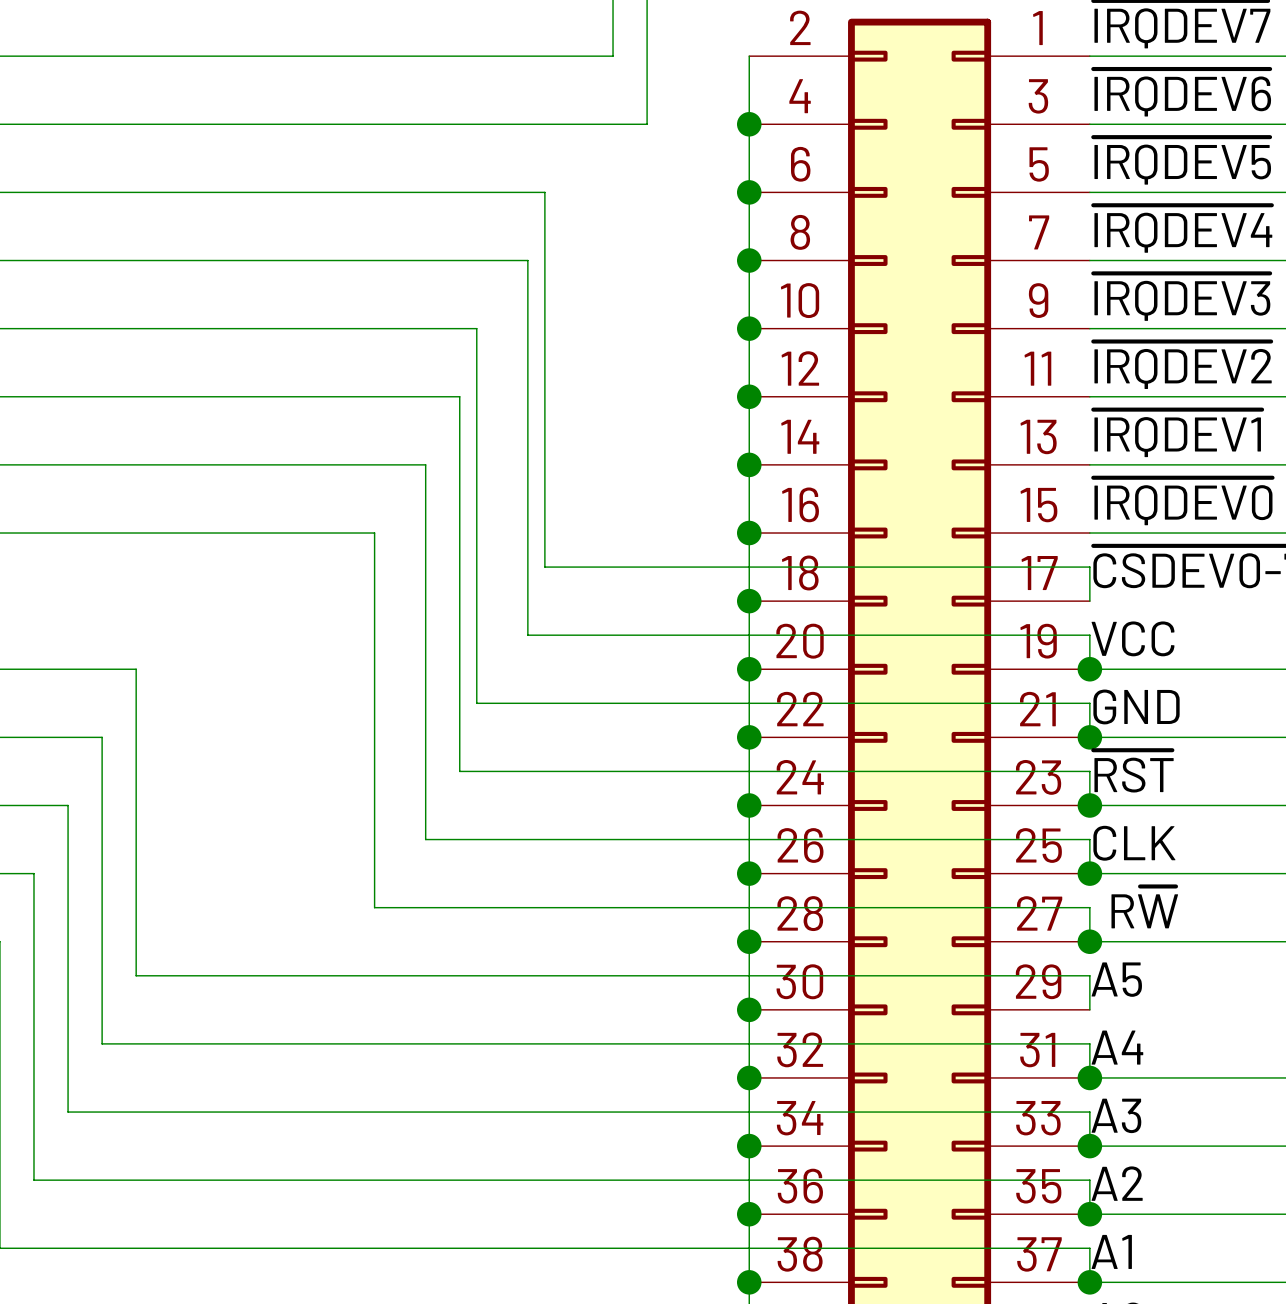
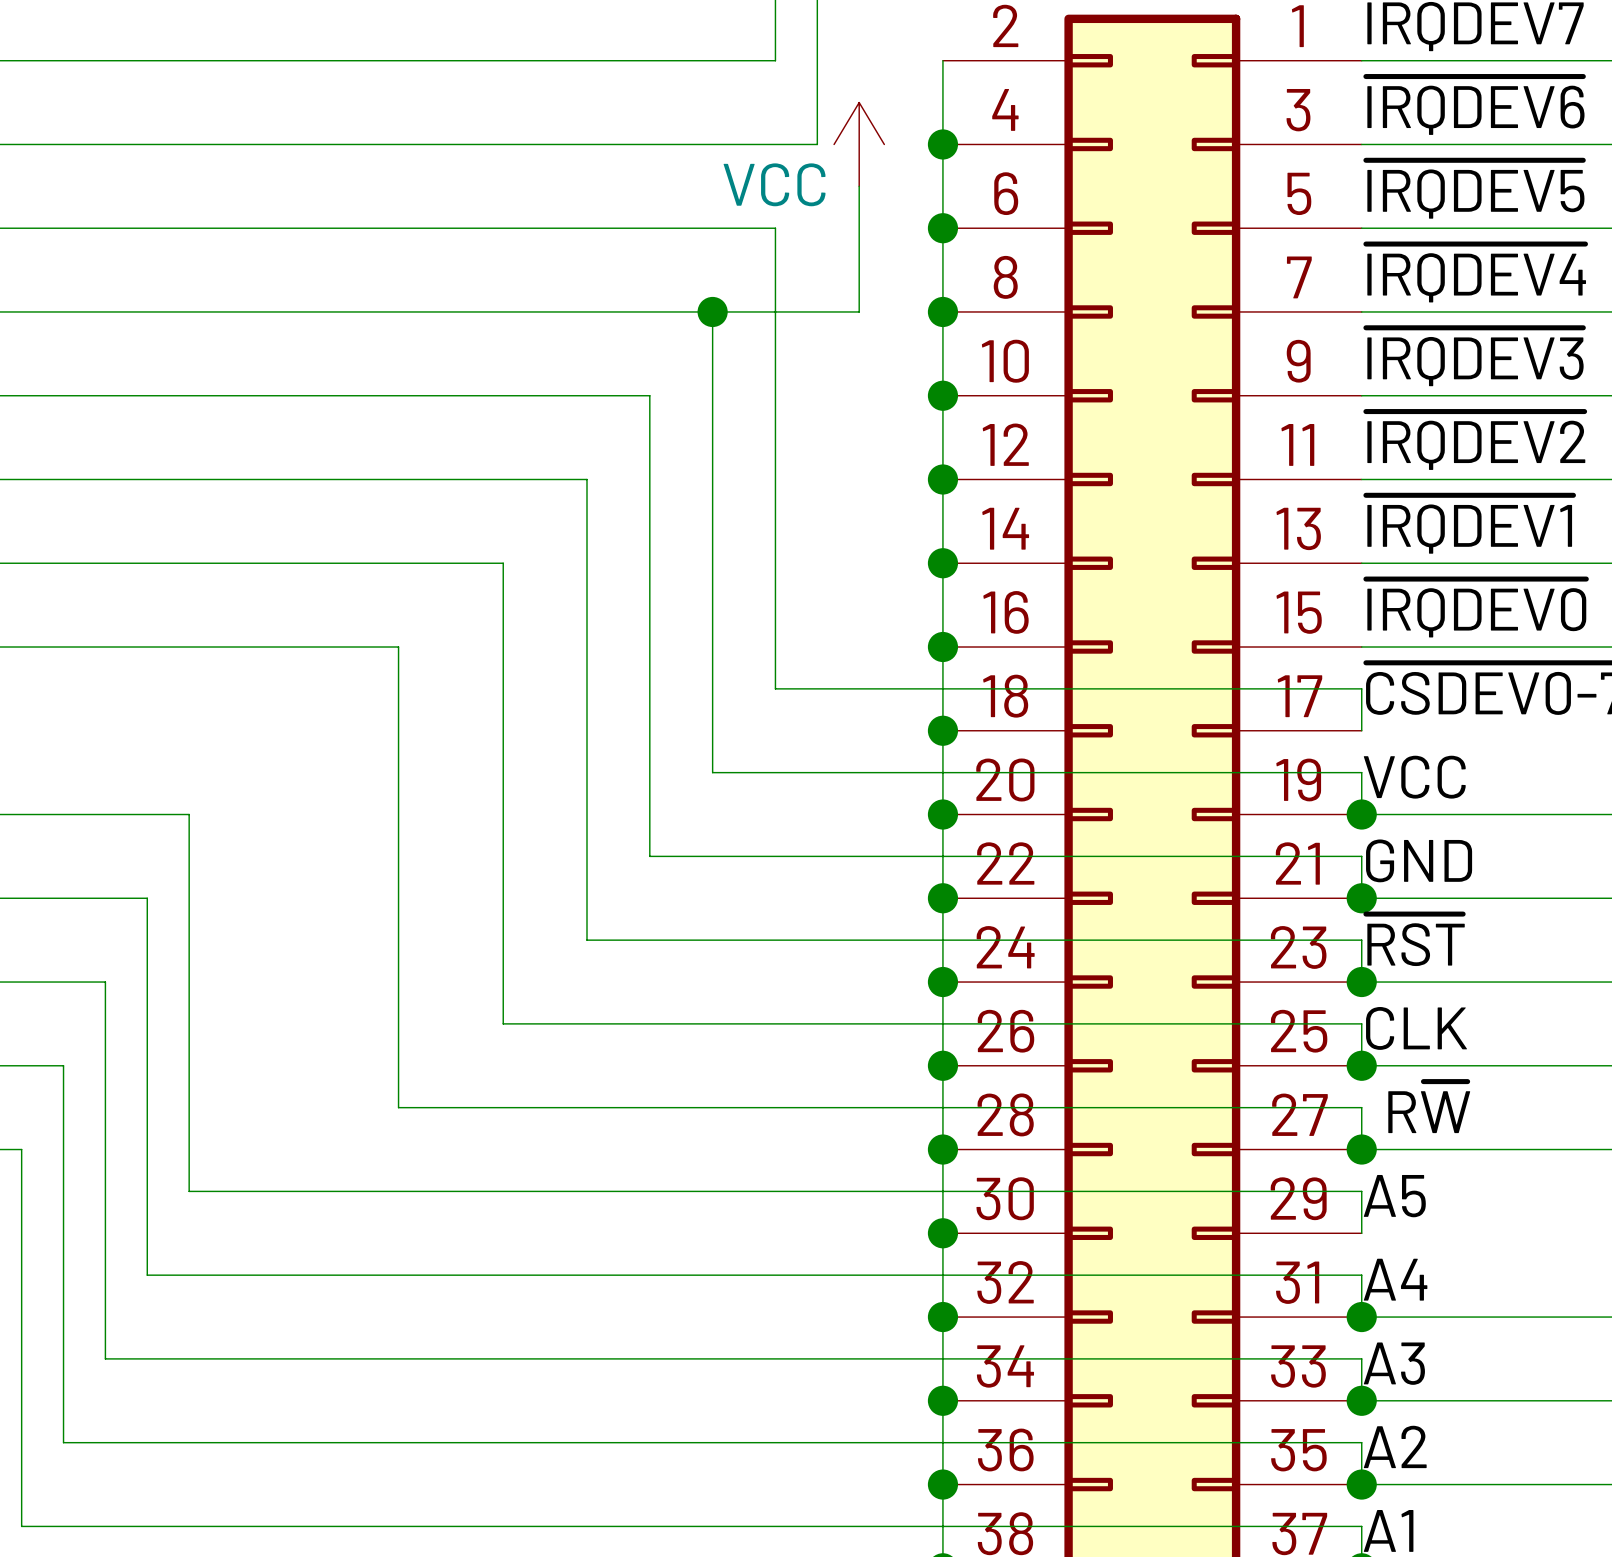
power symbol: none -> VCC (859, 144)
wire: none -> (859, 186) (859, 311) (670, 311)
wire: (544, 192) (544, 567) (613, 567) -> (691, 228) (775, 228) (775, 688)
wire: (527, 260) (527, 635) (561, 635) -> (712, 311) (712, 772)
junction: none -> (712, 311)
wire: (476, 328) (476, 703) (510, 703) -> (607, 395) (649, 395) (649, 856)
wire: (391, 464) (425, 464) (425, 839) -> (503, 563) (503, 1023) (545, 1023)
wire: (306, 533) (374, 533) (374, 907) -> (398, 647) (398, 1107) (482, 1107)

